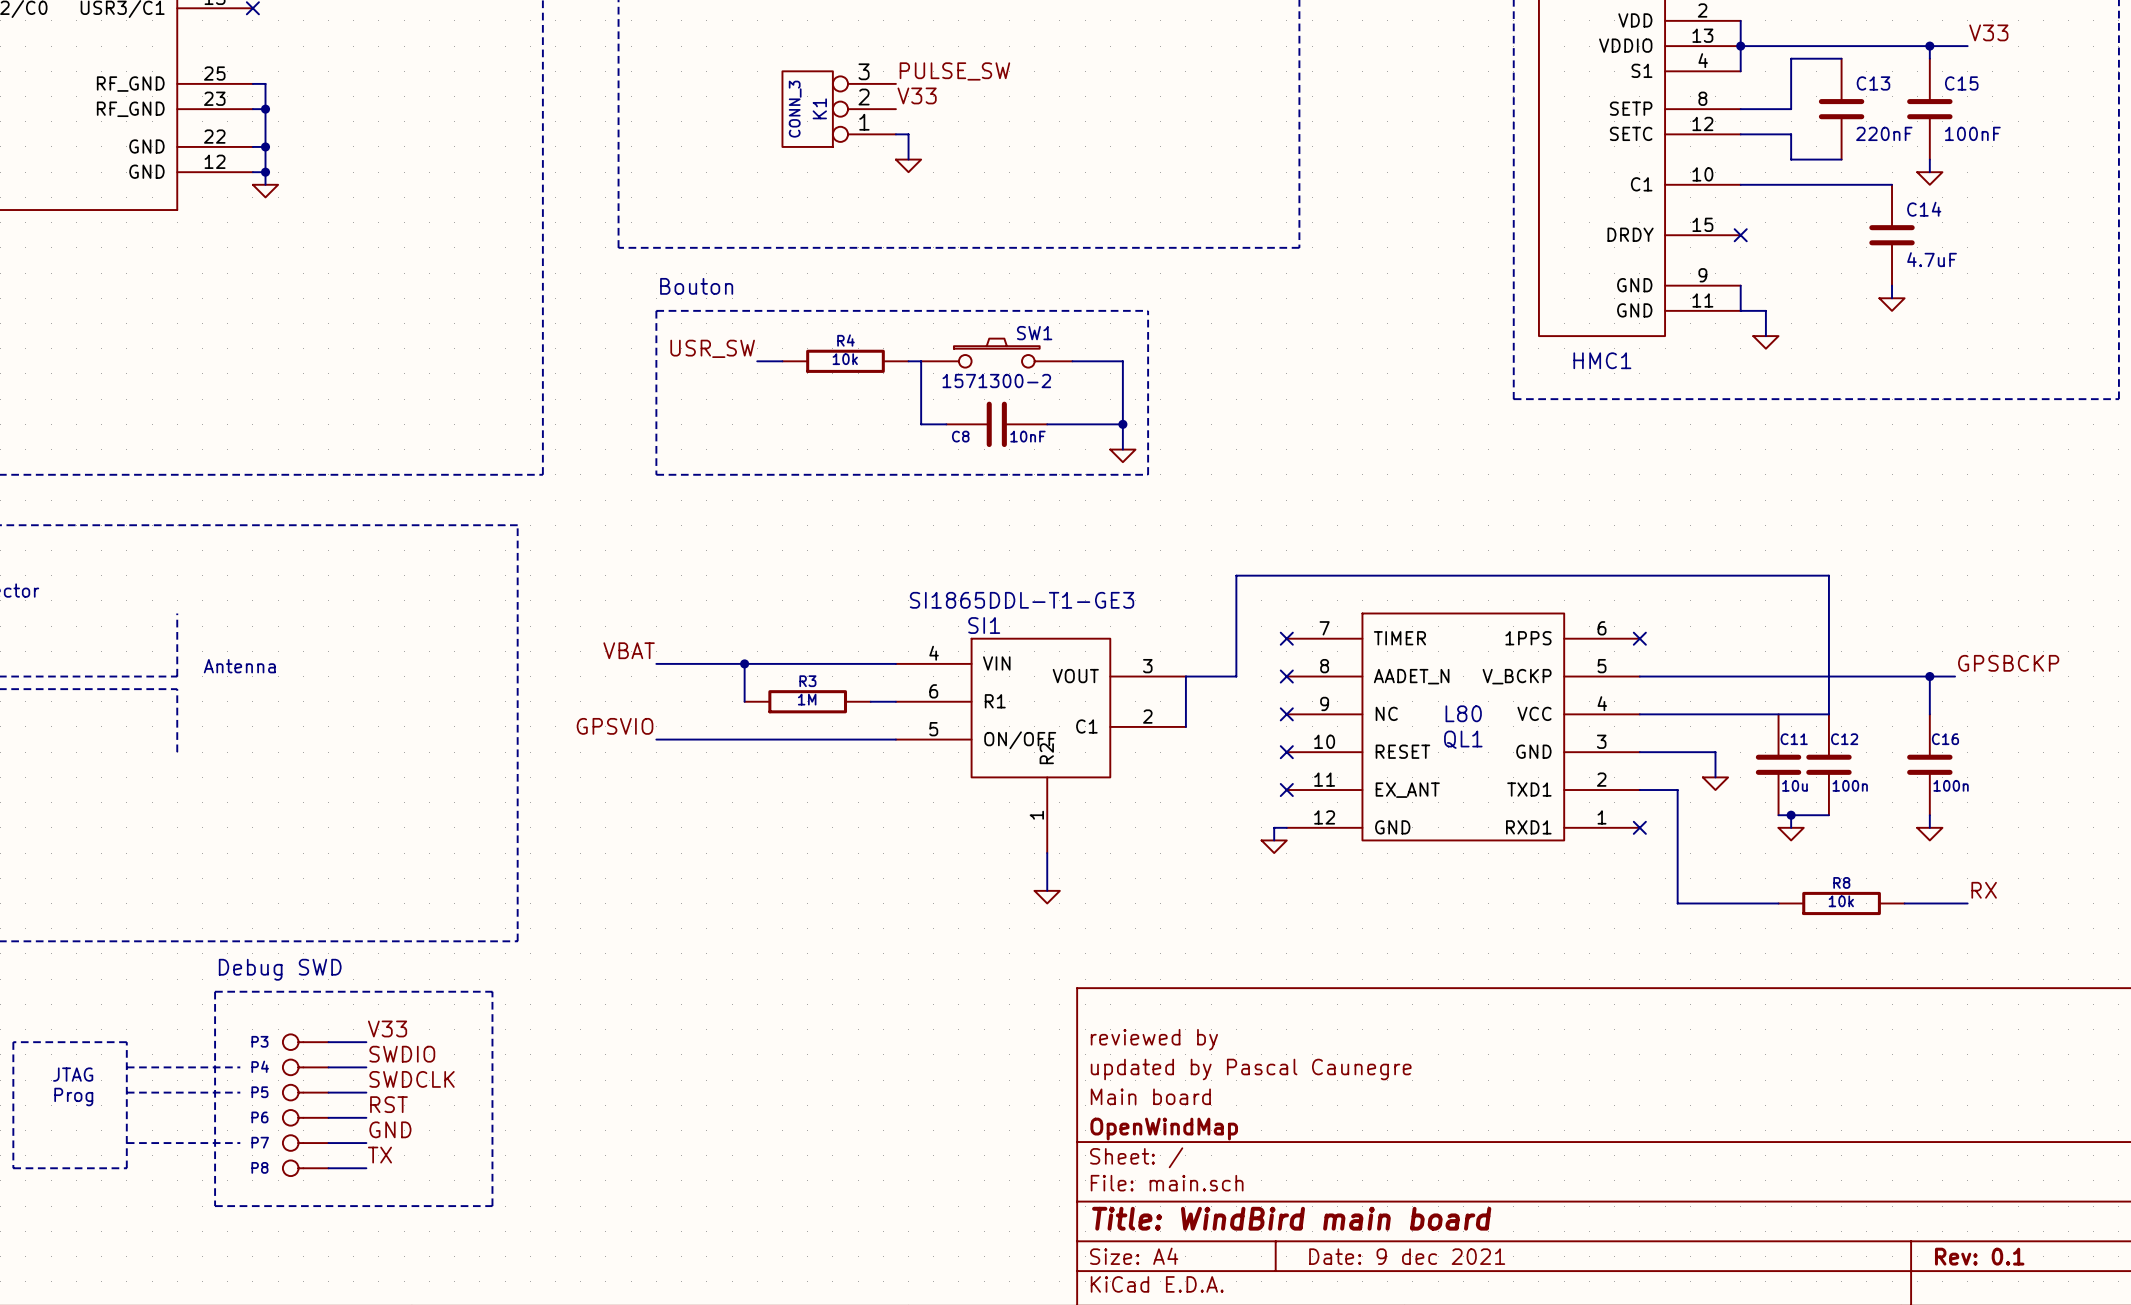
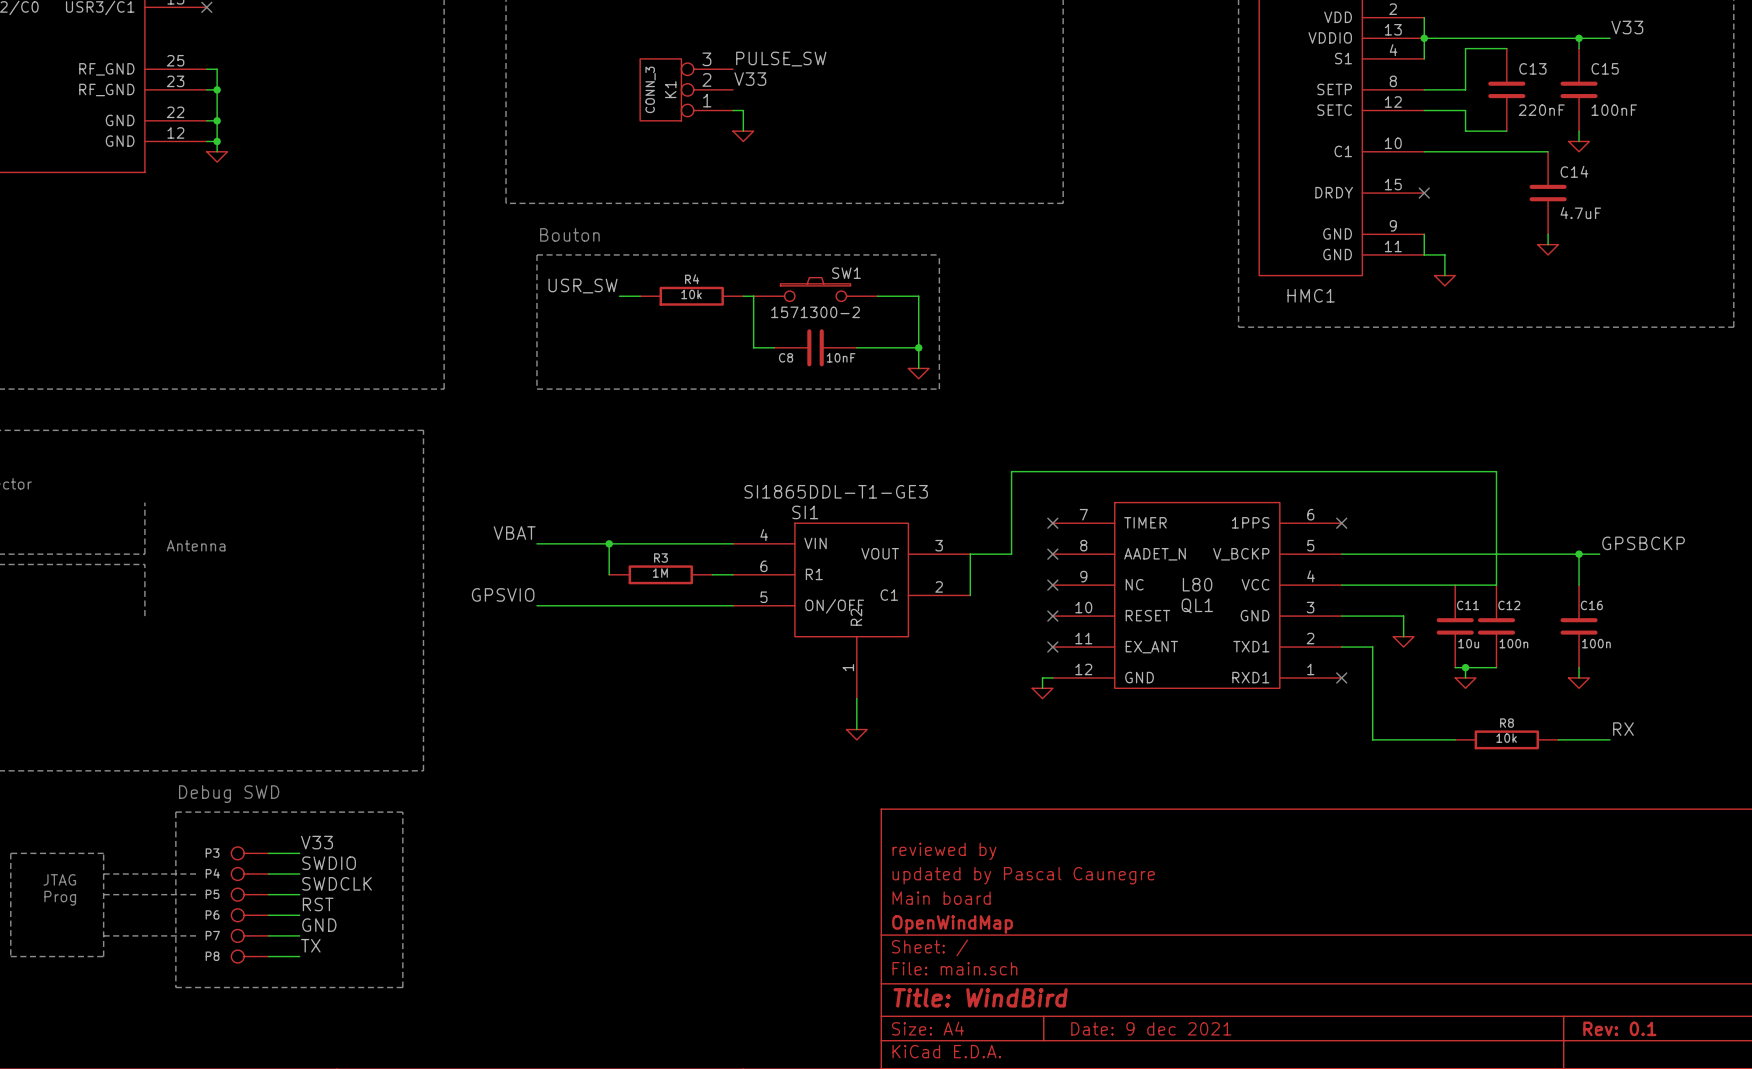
title block: Title: WindBird main board (1291, 1218) -> Title: WindBird (980, 997)

